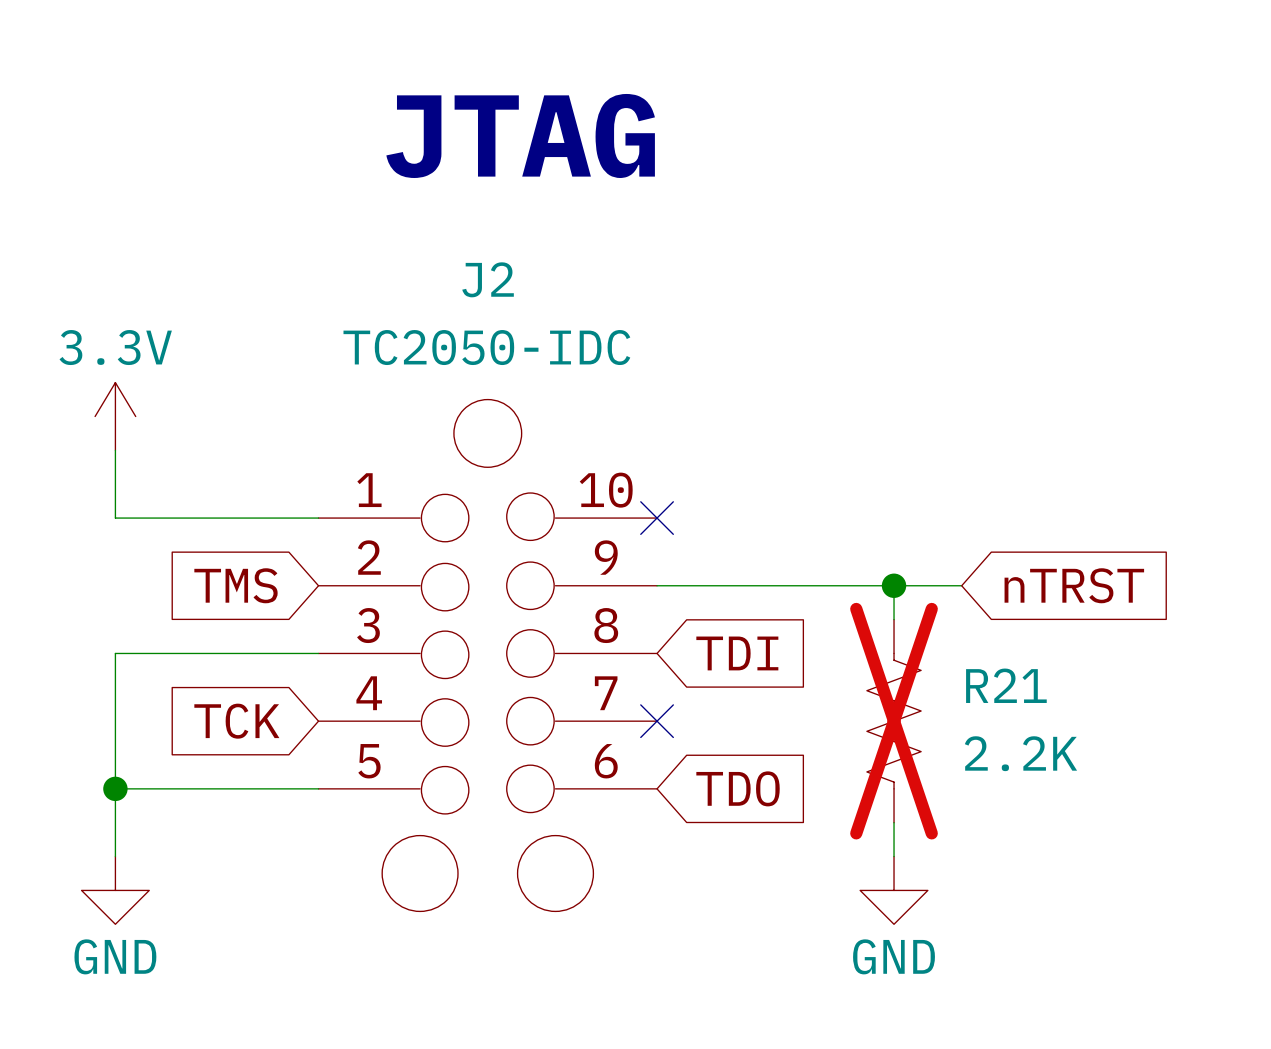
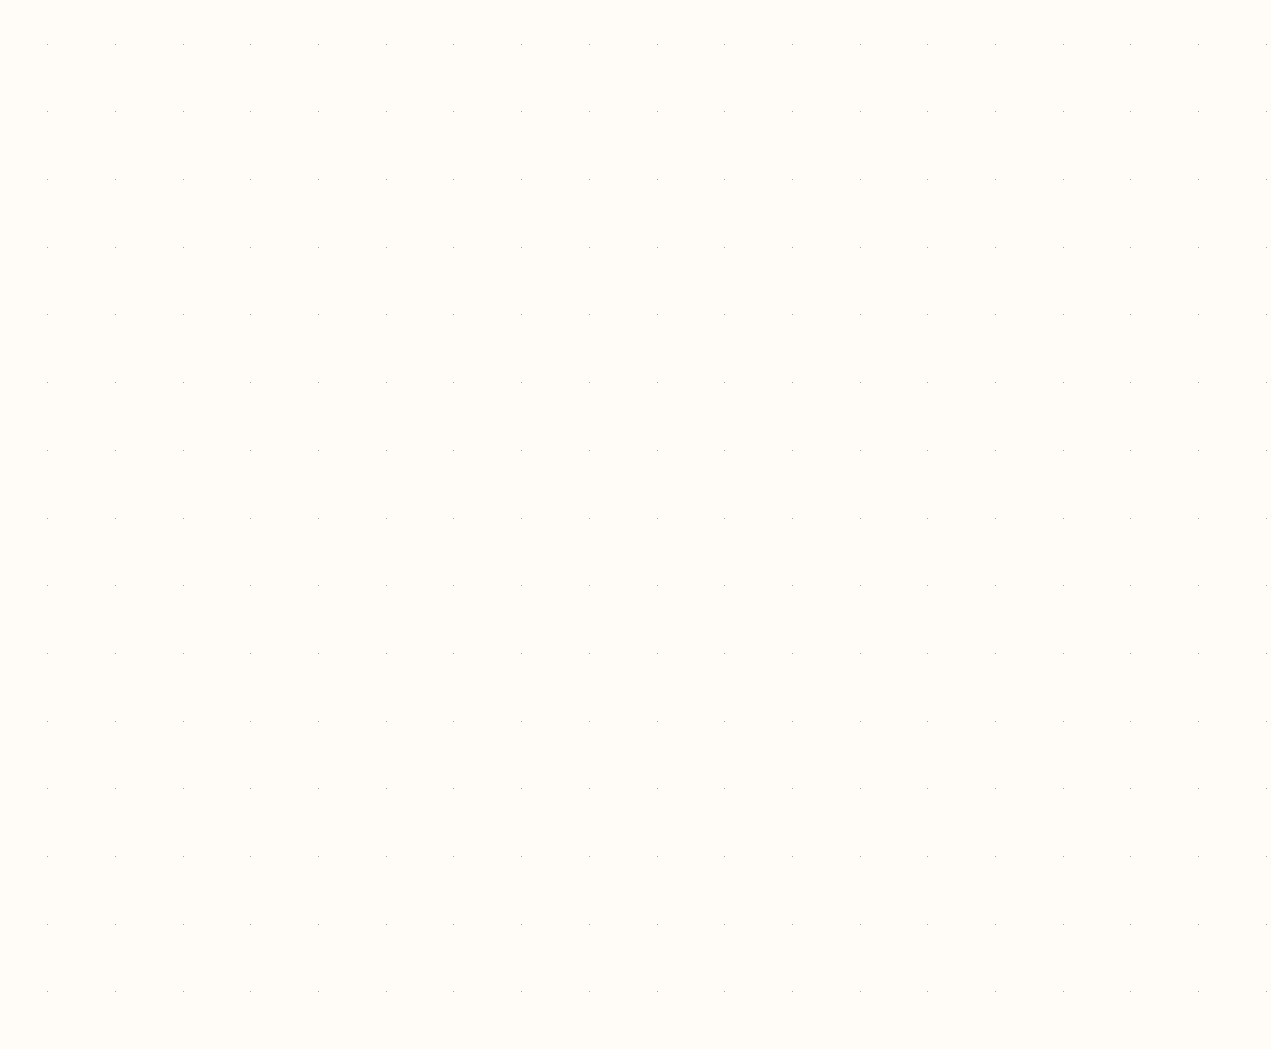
text: JTAG (520, 135) -> none
power symbol: 3.3V (115, 416) -> none
wire: (115, 450) (115, 518) (318, 518) -> none
no-connect mark: (657, 518) -> none
global label: TMS (235, 585) -> none
wire: (657, 585) (961, 585) -> none
wire: (894, 585) (894, 619) -> none
junction: (894, 585) -> none
global label: nTRST (1074, 585) -> none
wire: (318, 653) (115, 653) (115, 856) -> none
global label: TDI (737, 653) -> none
J2: TC2050-IDC (487, 655) -> none
global label: TCK (236, 721) -> none
no-connect mark: (657, 721) -> none
R21: 2.2K (894, 721) -> none
wire: (115, 788) (318, 788) -> none
junction: (115, 788) -> none
global label: TDO (738, 788) -> none
wire: (894, 822) (894, 856) -> none
power symbol: GND (115, 890) -> none
power symbol: GND (894, 890) -> none

